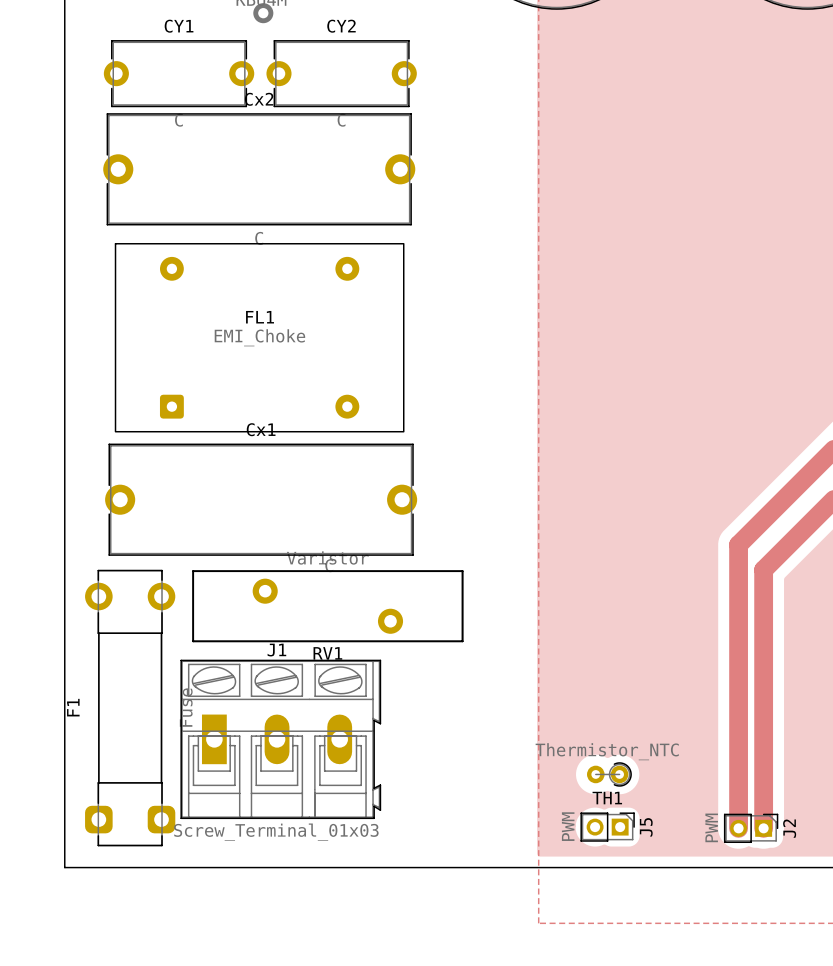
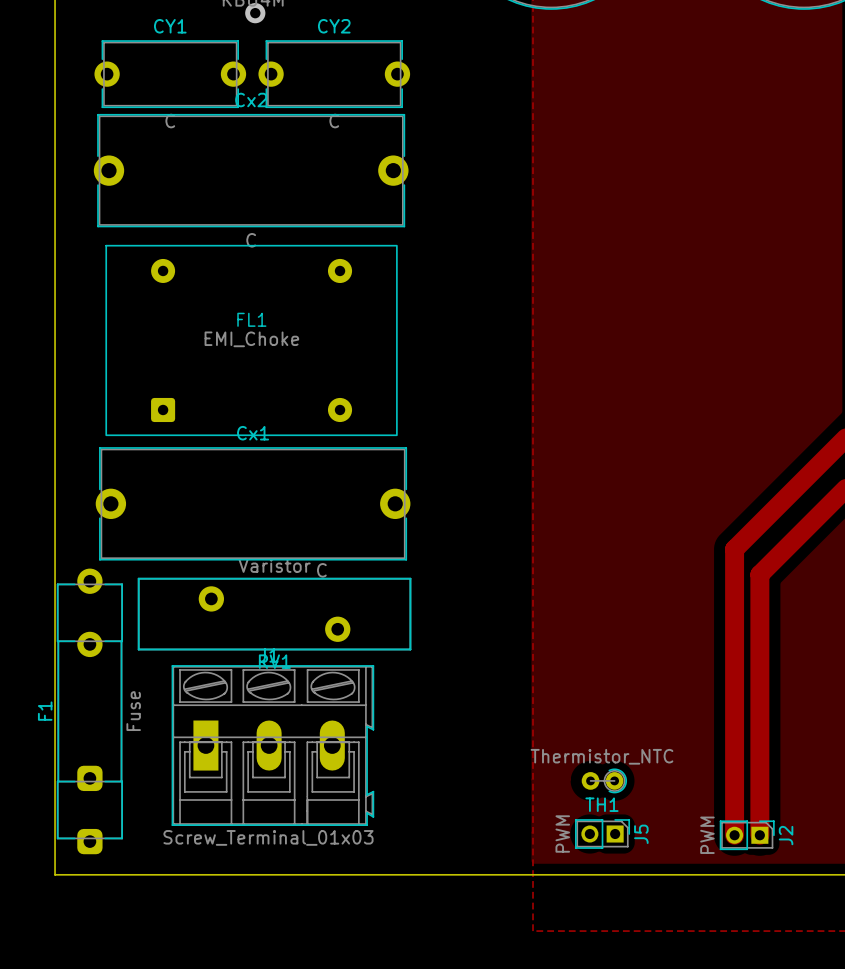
F1 footprint: [85, 569, 176, 847] -> [56, 568, 123, 855]
RV1 position: (327, 606) -> (274, 614)

